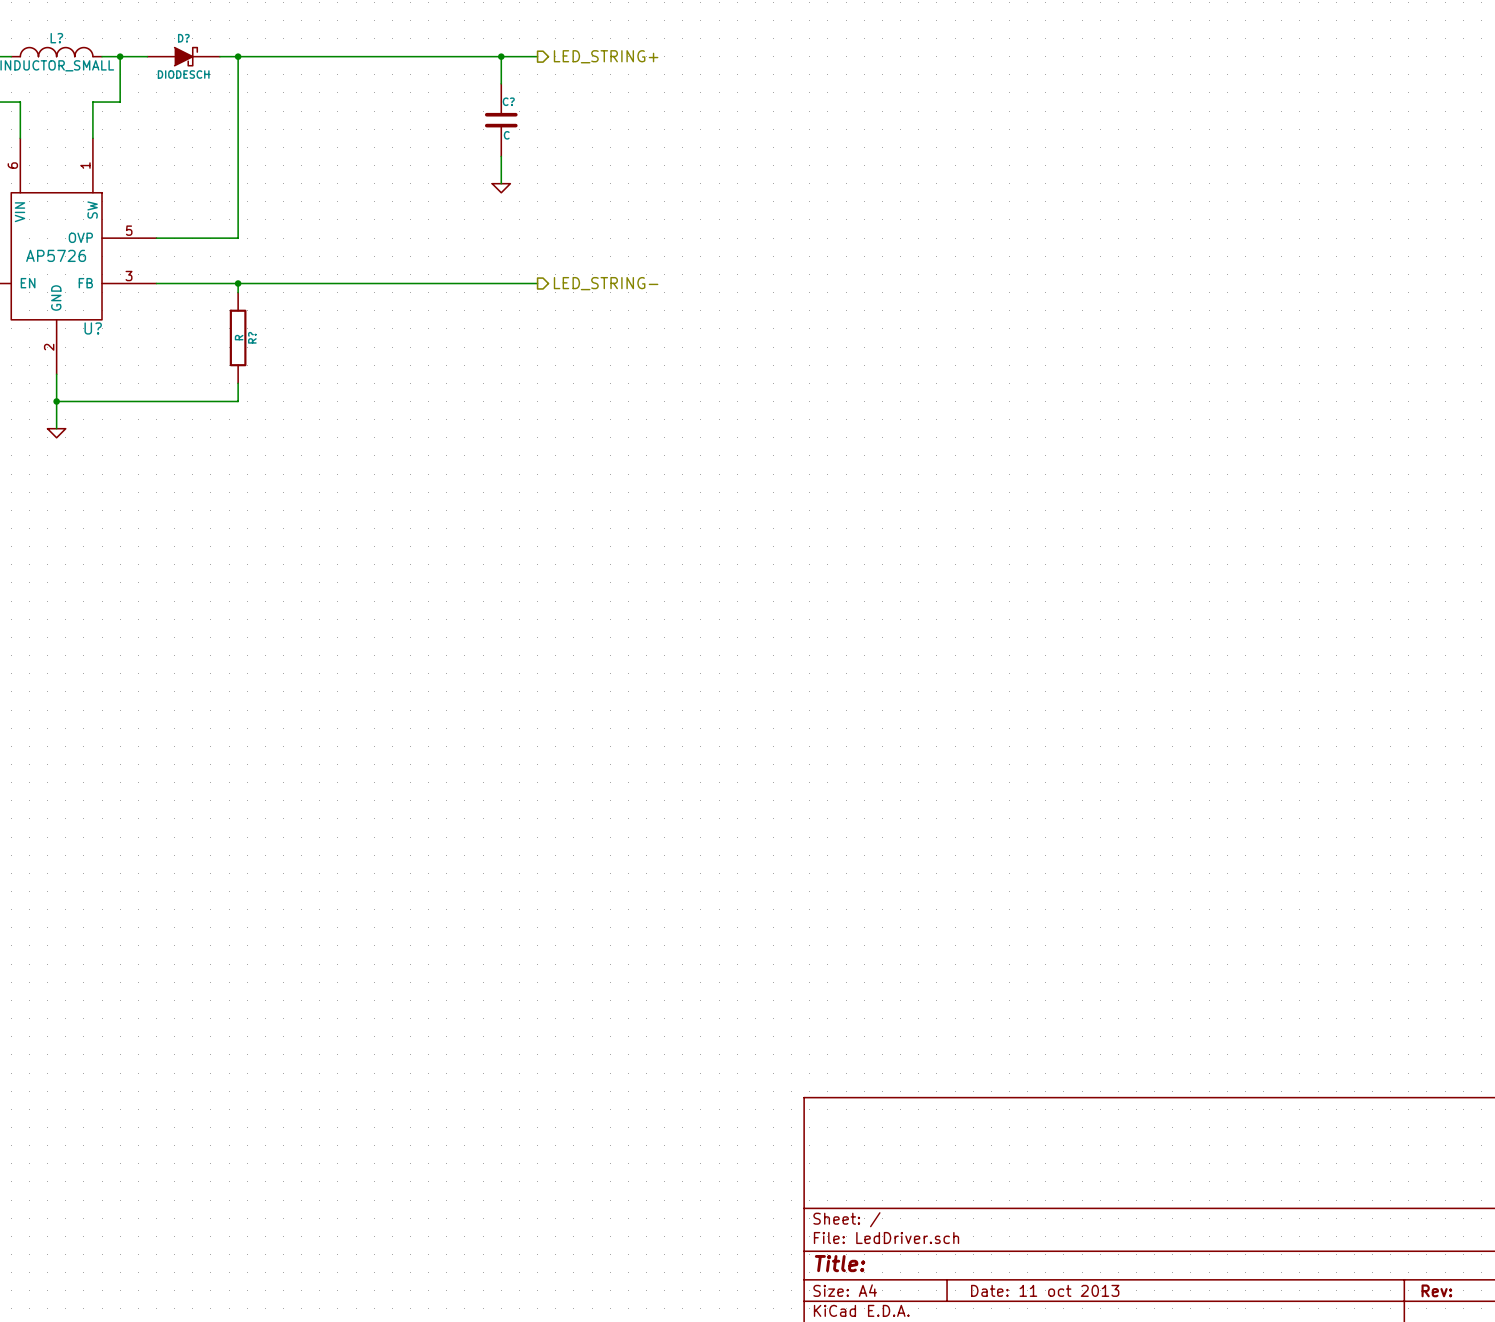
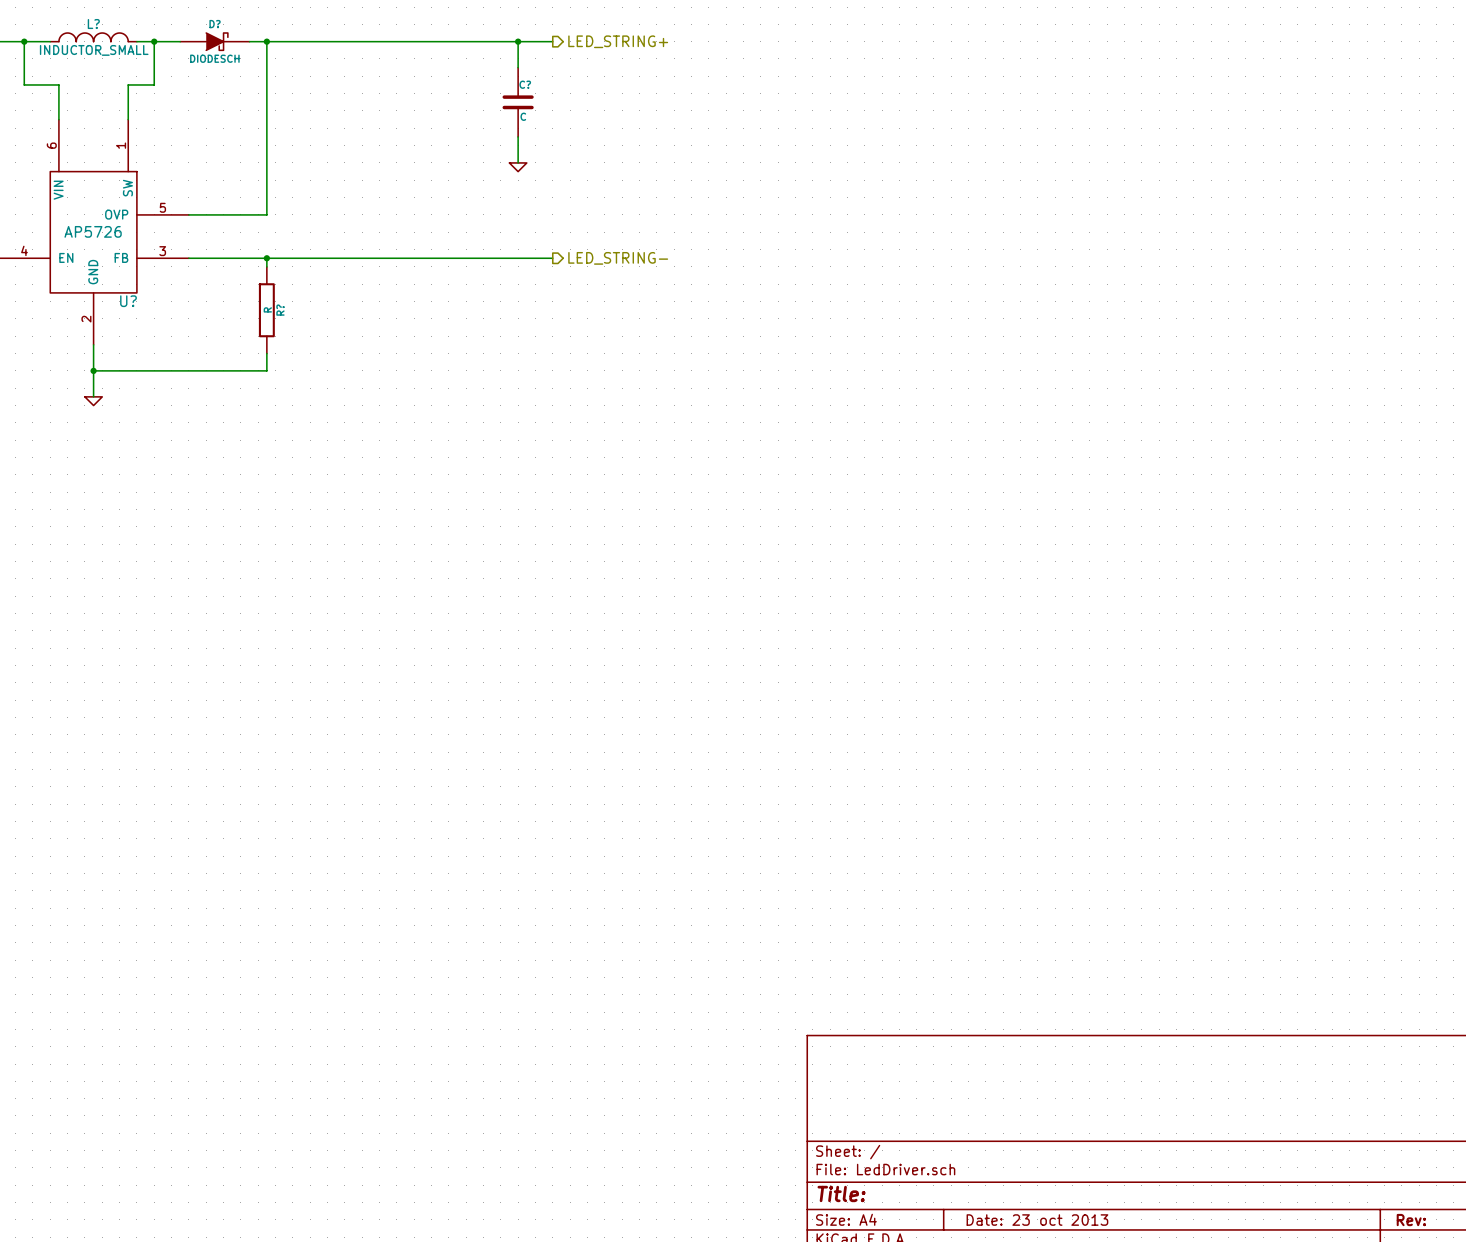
title block: Date: 11 oct 2013 (1045, 1290) -> Date: 23 oct 2013 (1037, 1220)

